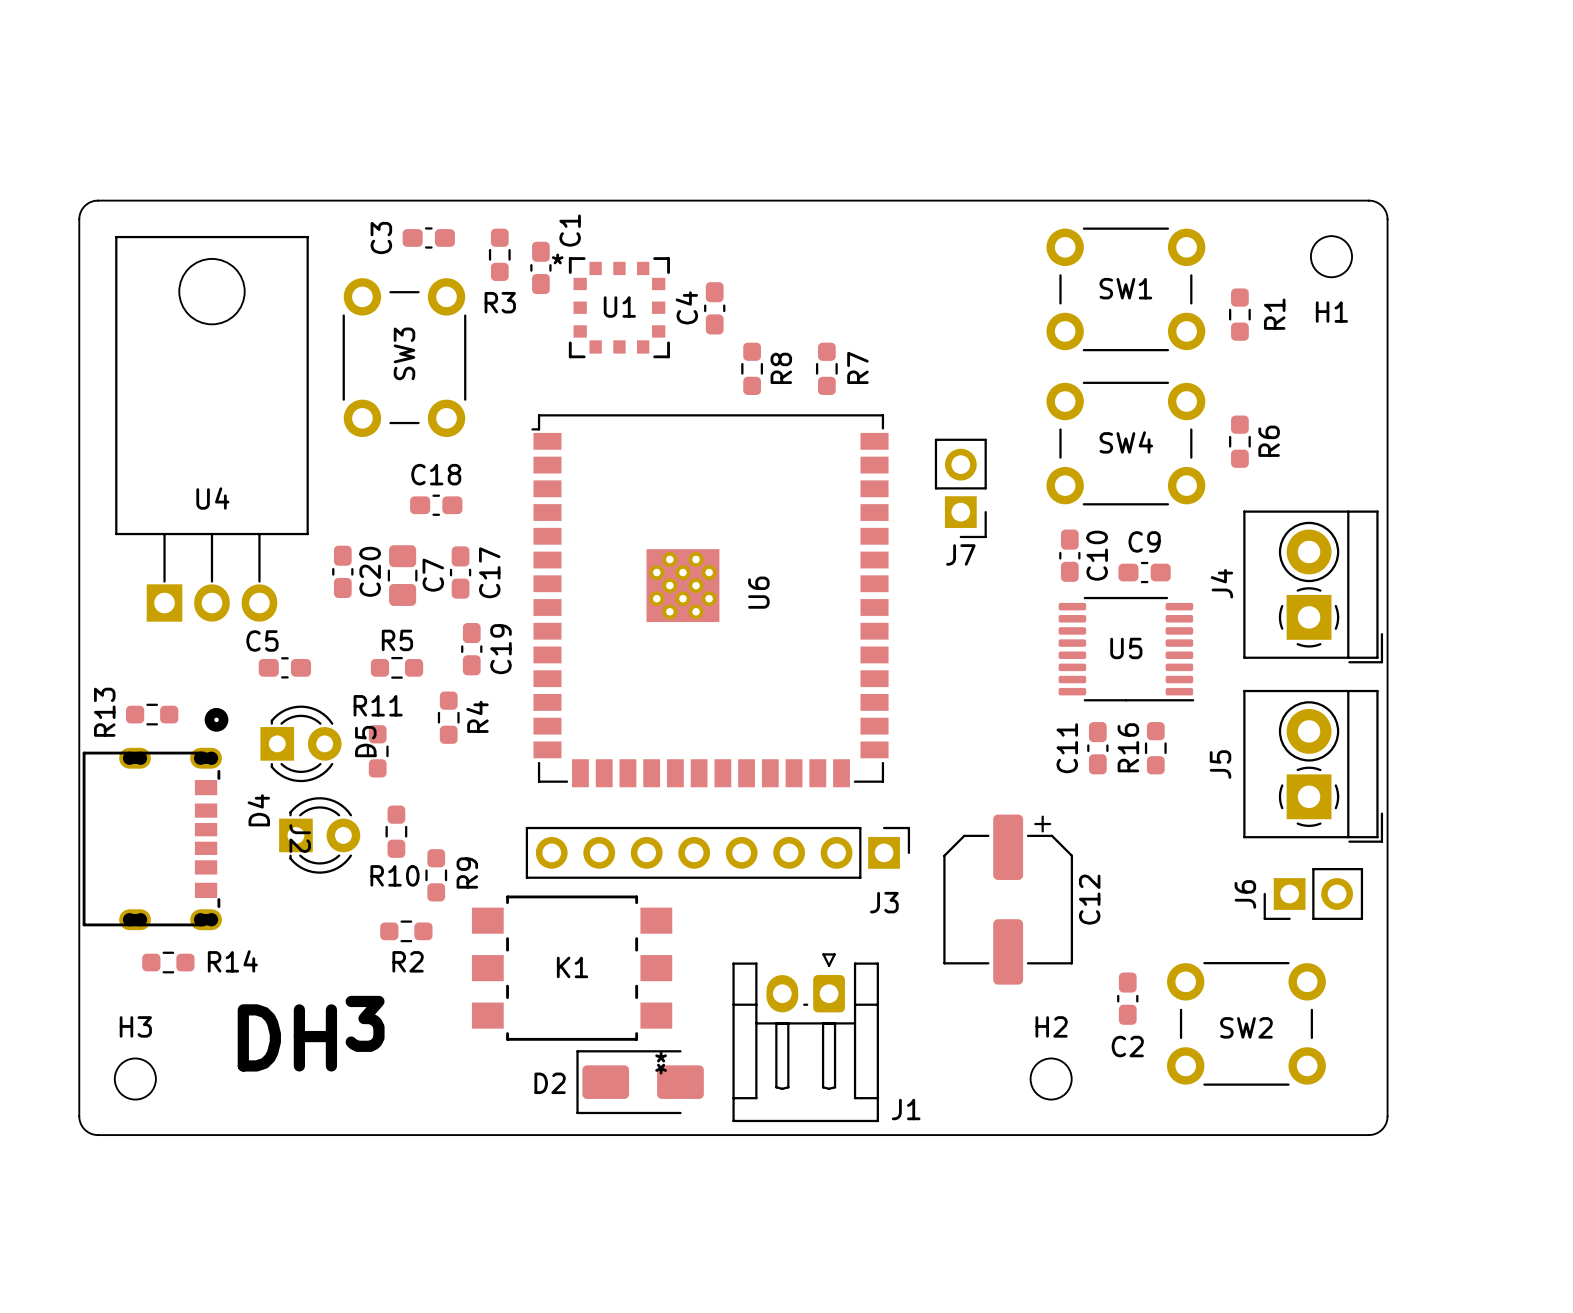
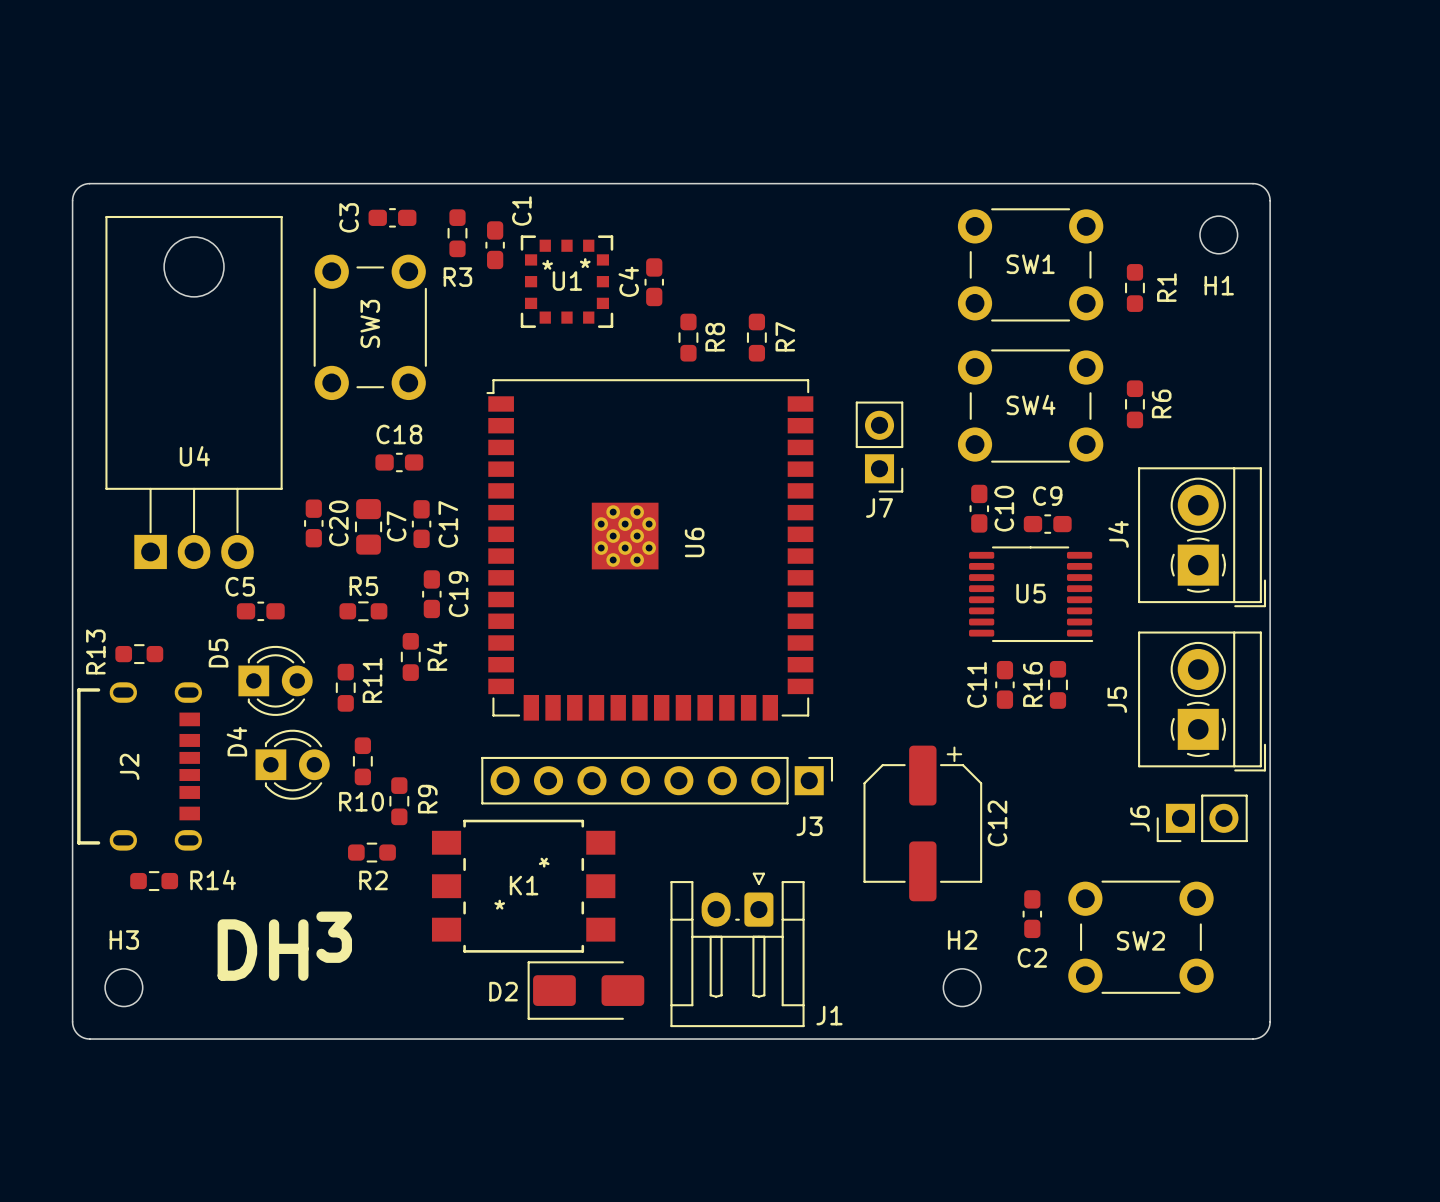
U1 text position: * (557, 258) -> * (547, 264)
U1 text: none -> * (585, 263)
R11 name rotation: 0° (378, 705) -> 90° counterclockwise (372, 680)
J2 footprint: [82, 707, 229, 931] -> [77, 682, 203, 851]
D5 name position: D5 (365, 741) -> D5 (218, 653)
J2 name position: J2 (300, 838) -> J2 (129, 766)
K1 footprint: [471, 895, 673, 1041] -> [431, 819, 616, 953]

